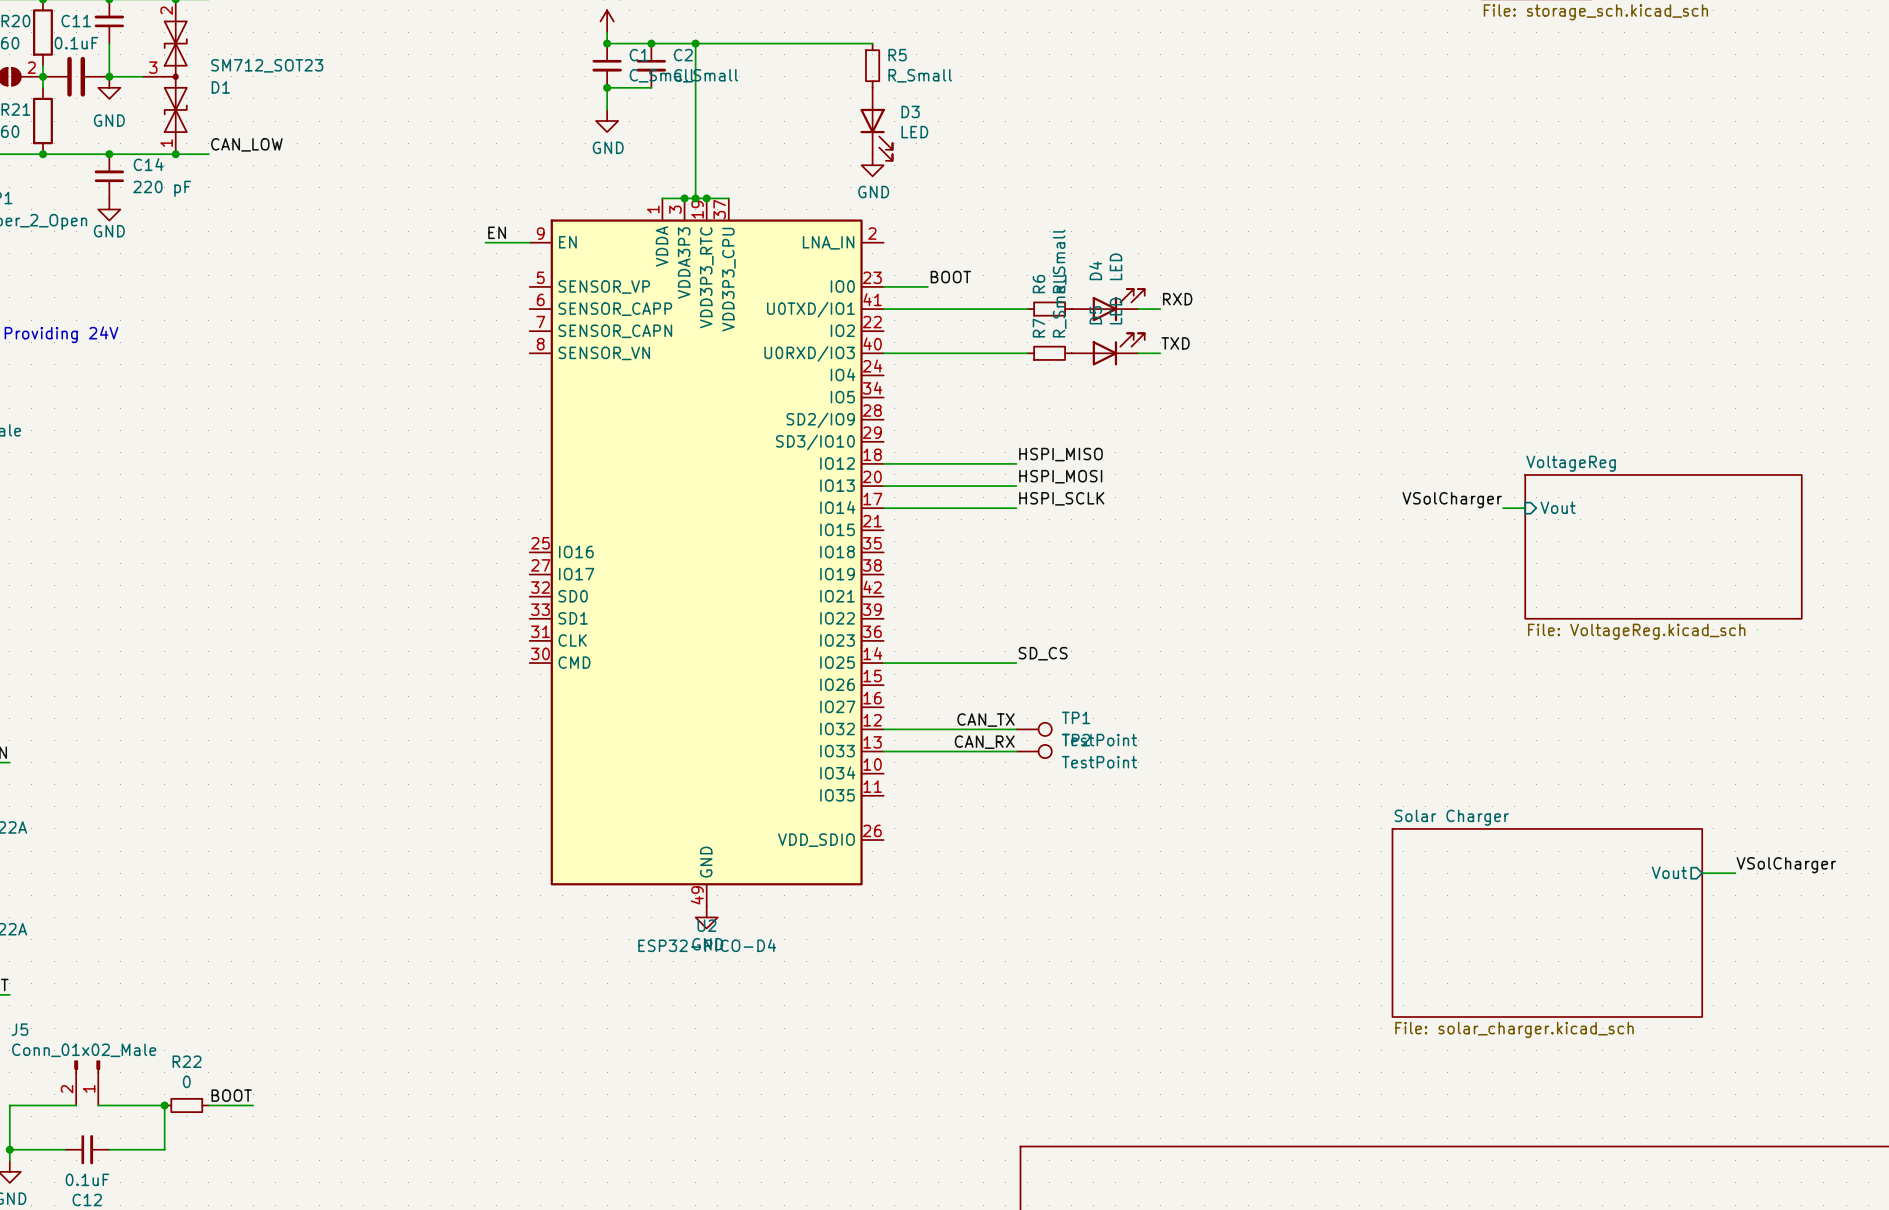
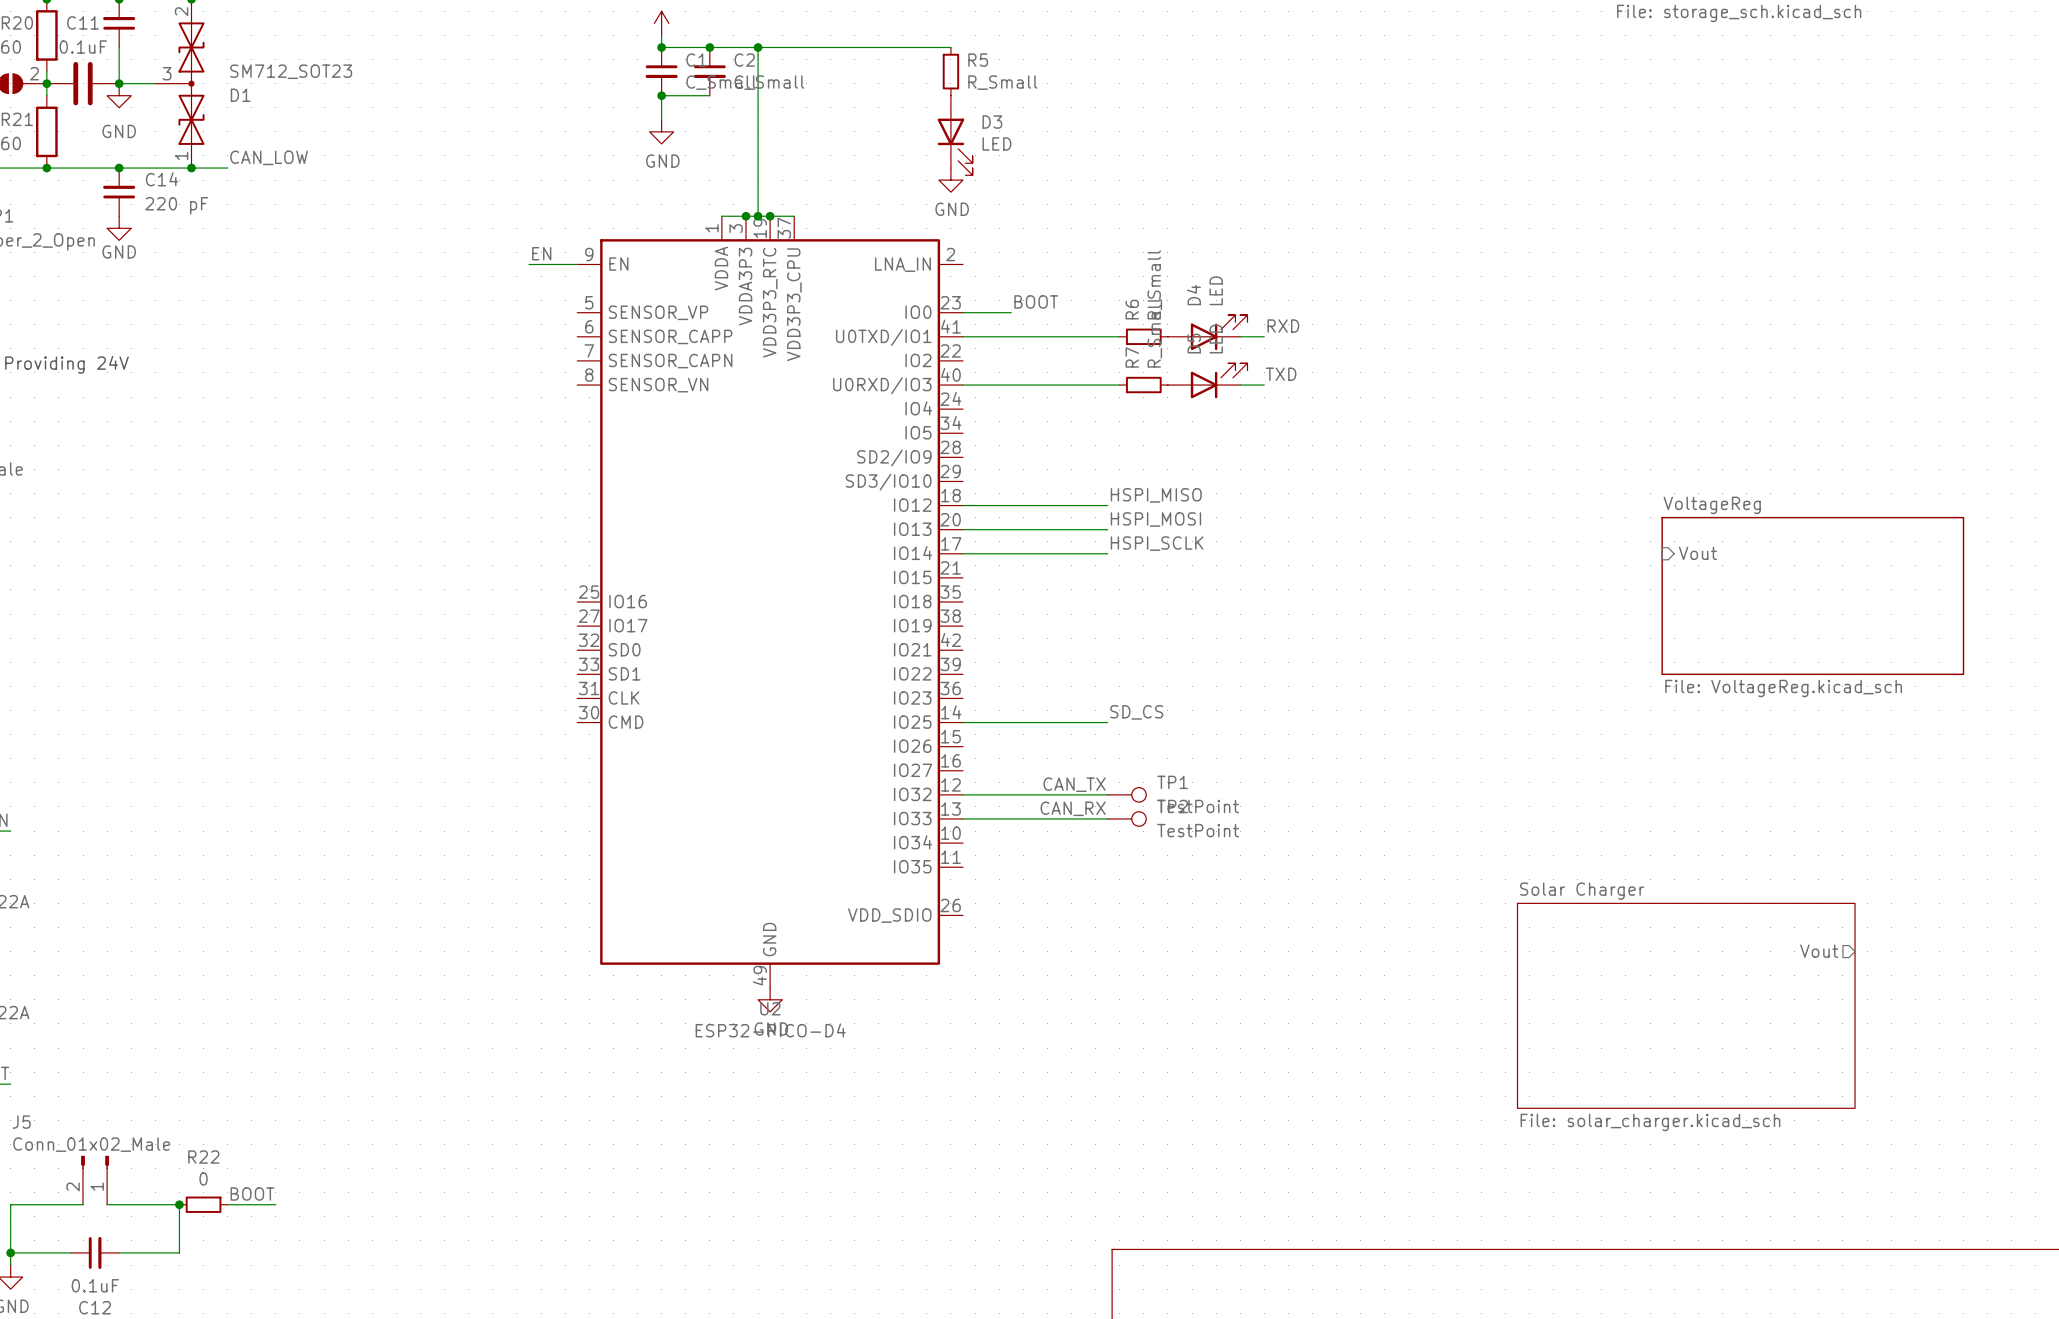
label: VSolCharger (1452, 500) -> none
wire: (1503, 508) (1525, 508) -> none
label: VSolCharger (1786, 865) -> none
wire: (1702, 873) (1735, 873) -> none

